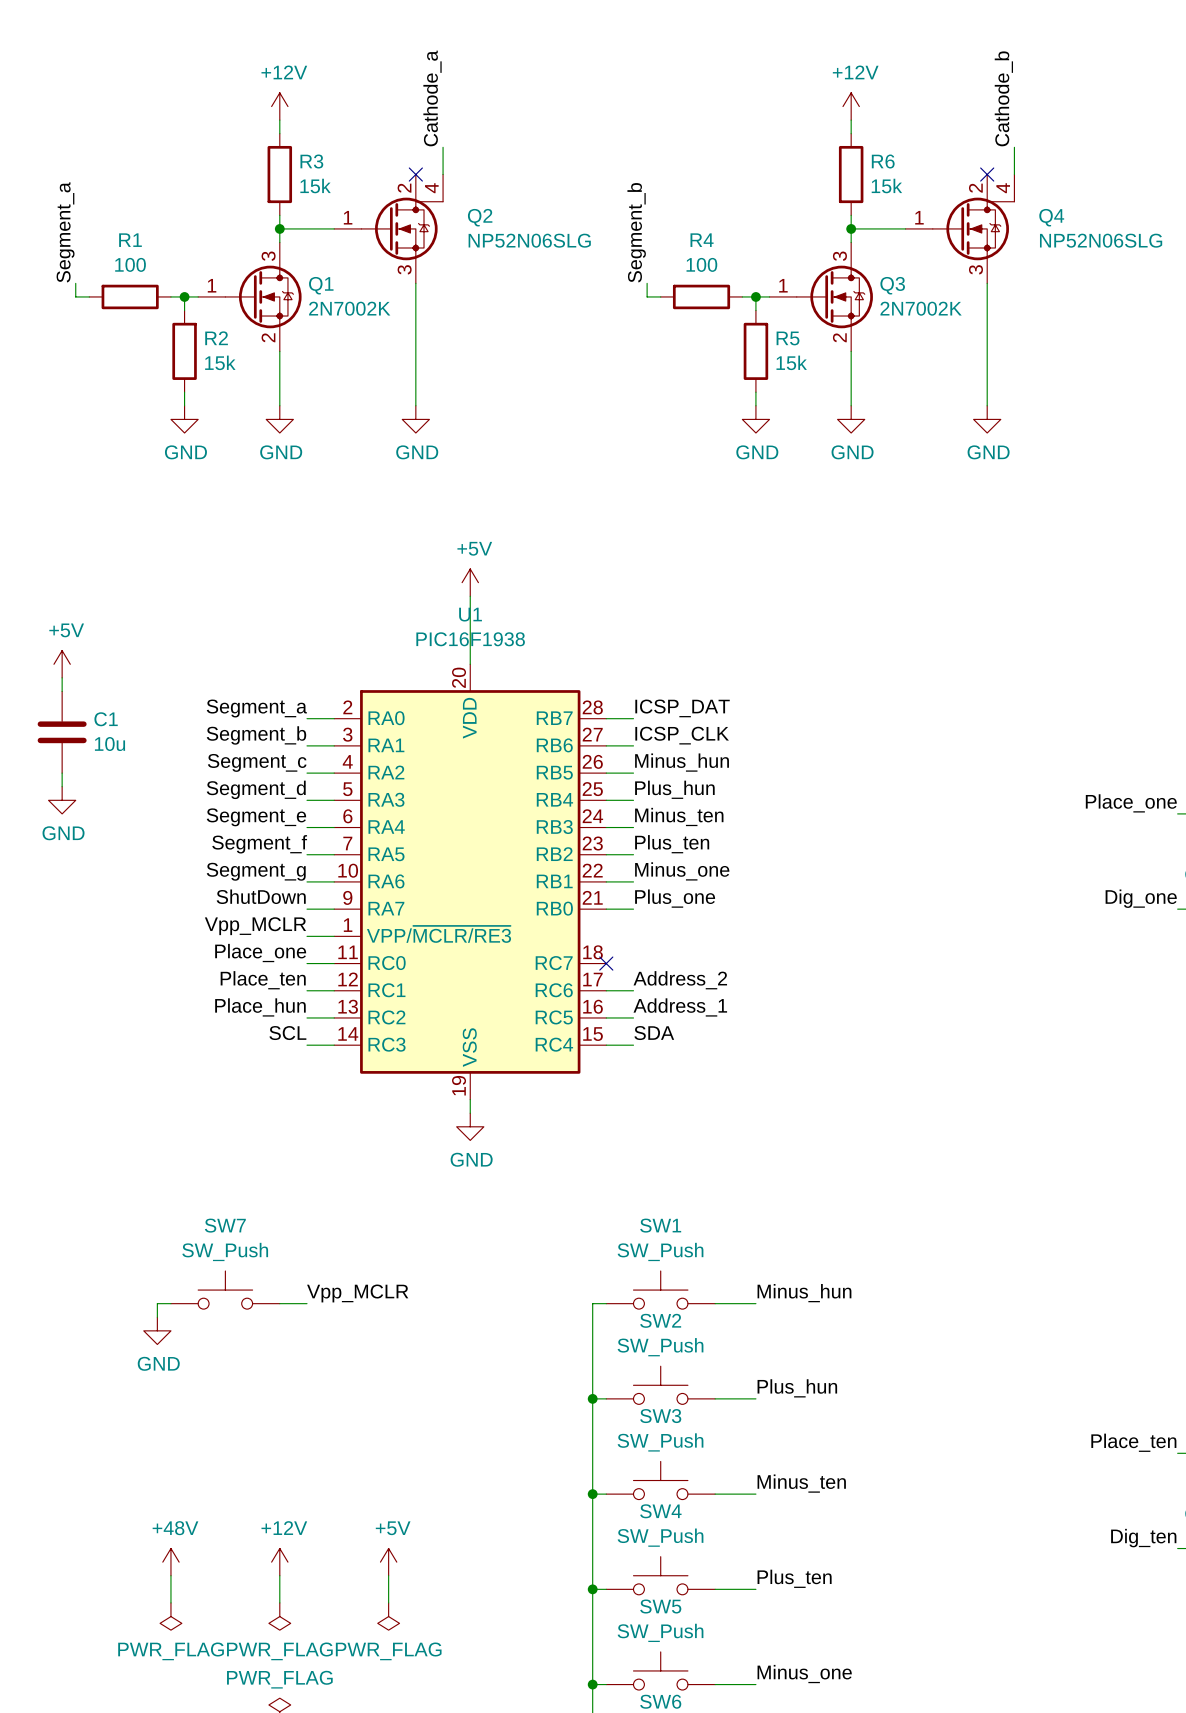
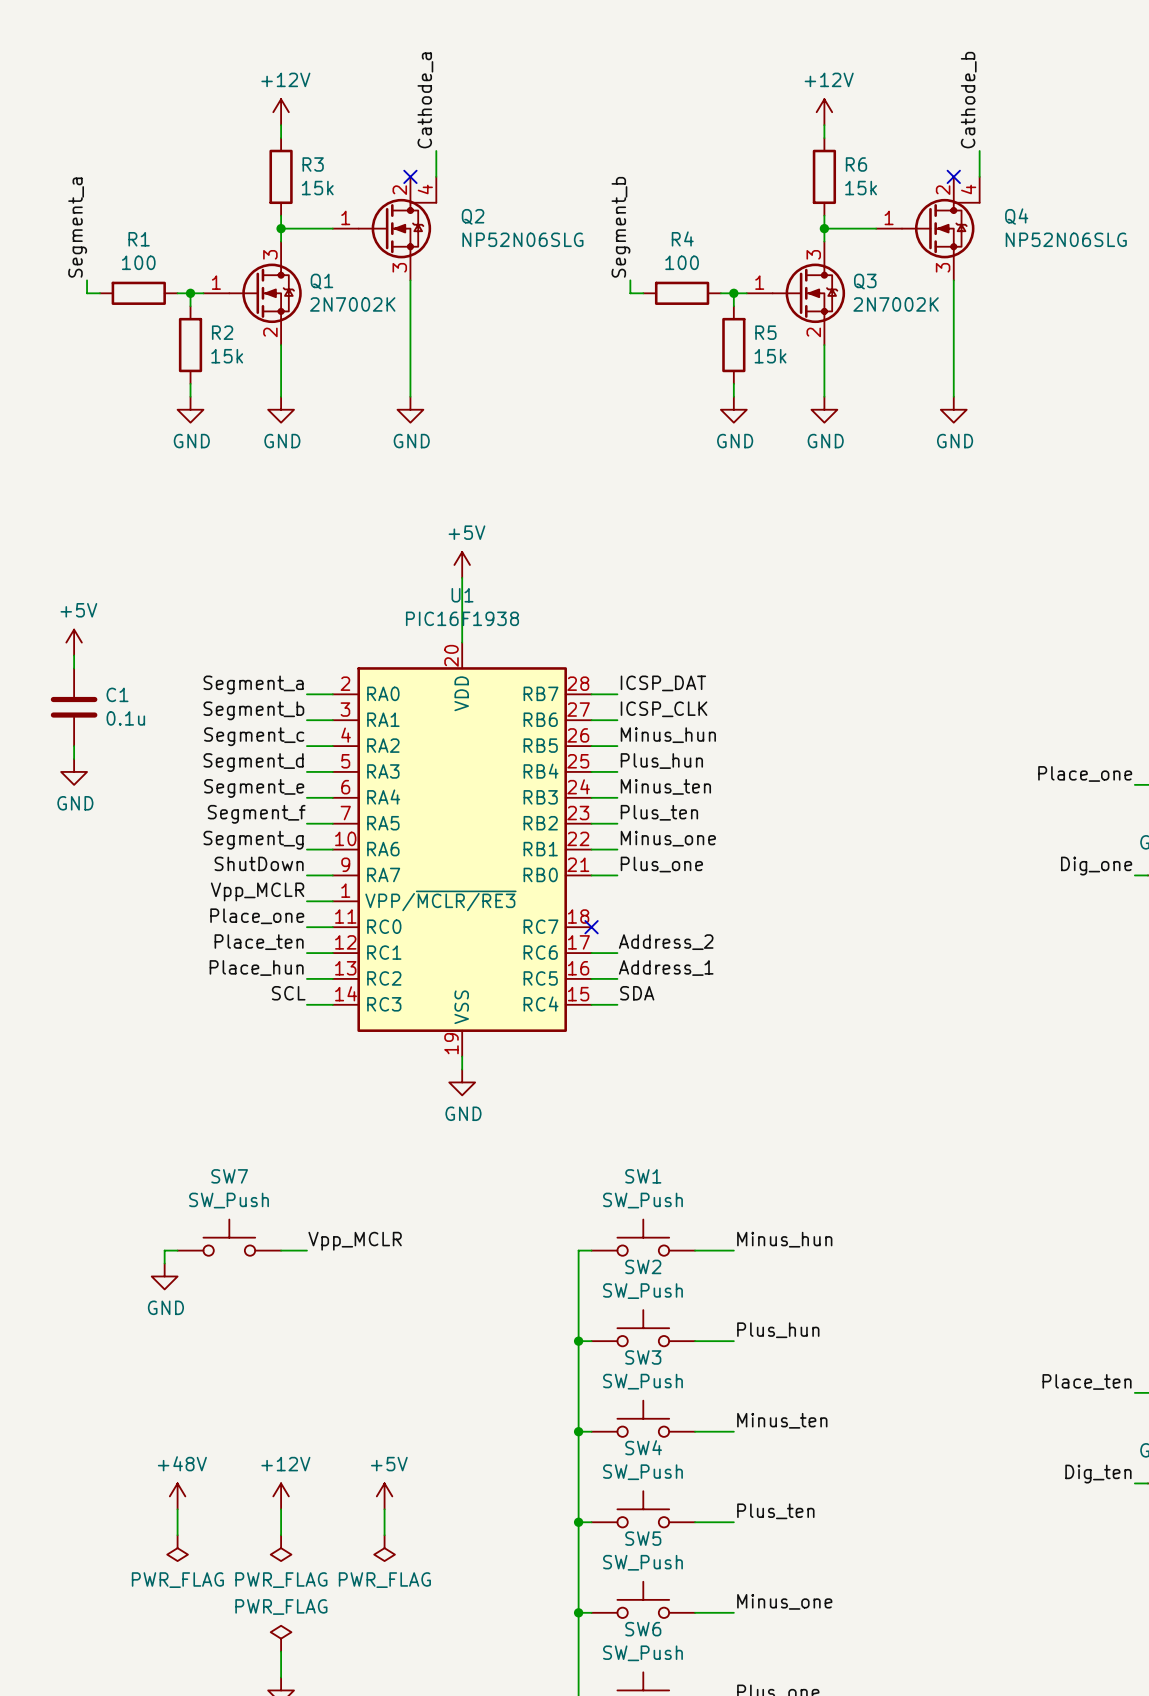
C1 value: 10u (110, 744) -> 0.1u (125, 718)

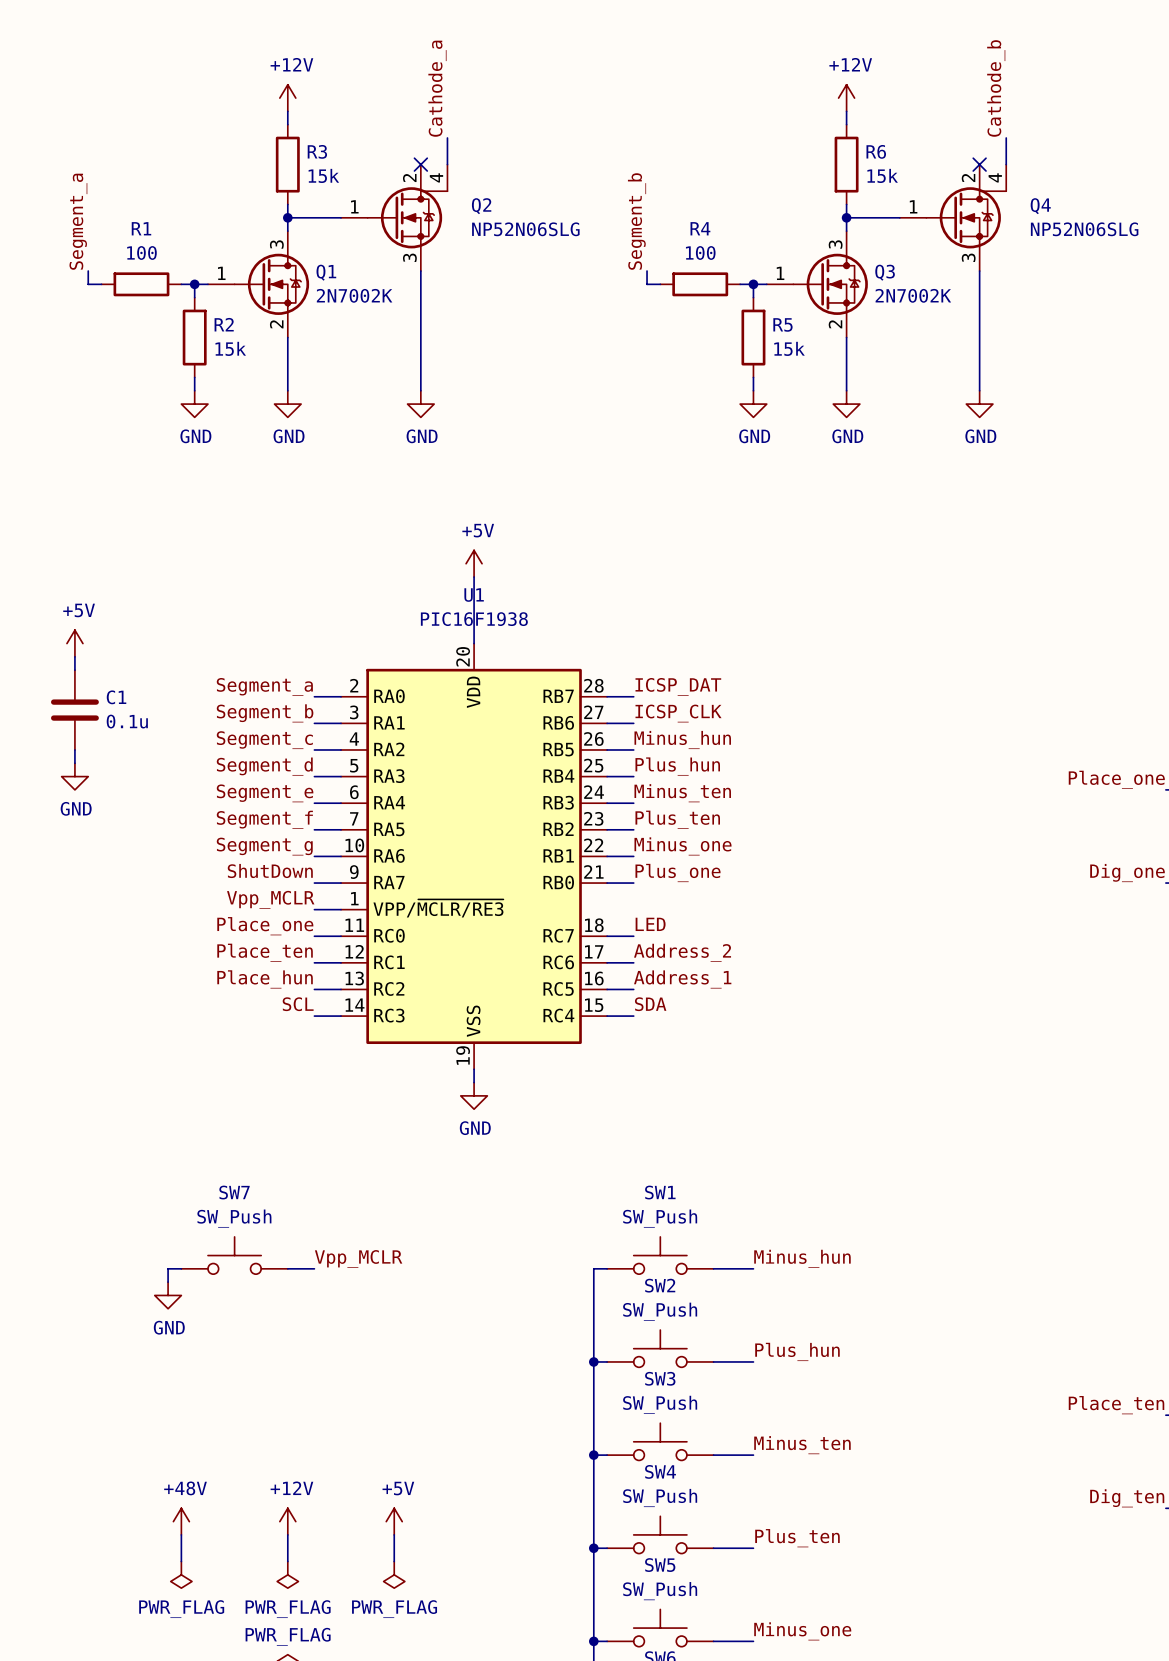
label: none -> LED (650, 924)
wire: none -> (607, 936) (633, 936)
no-connect mark: (591, 927) -> none

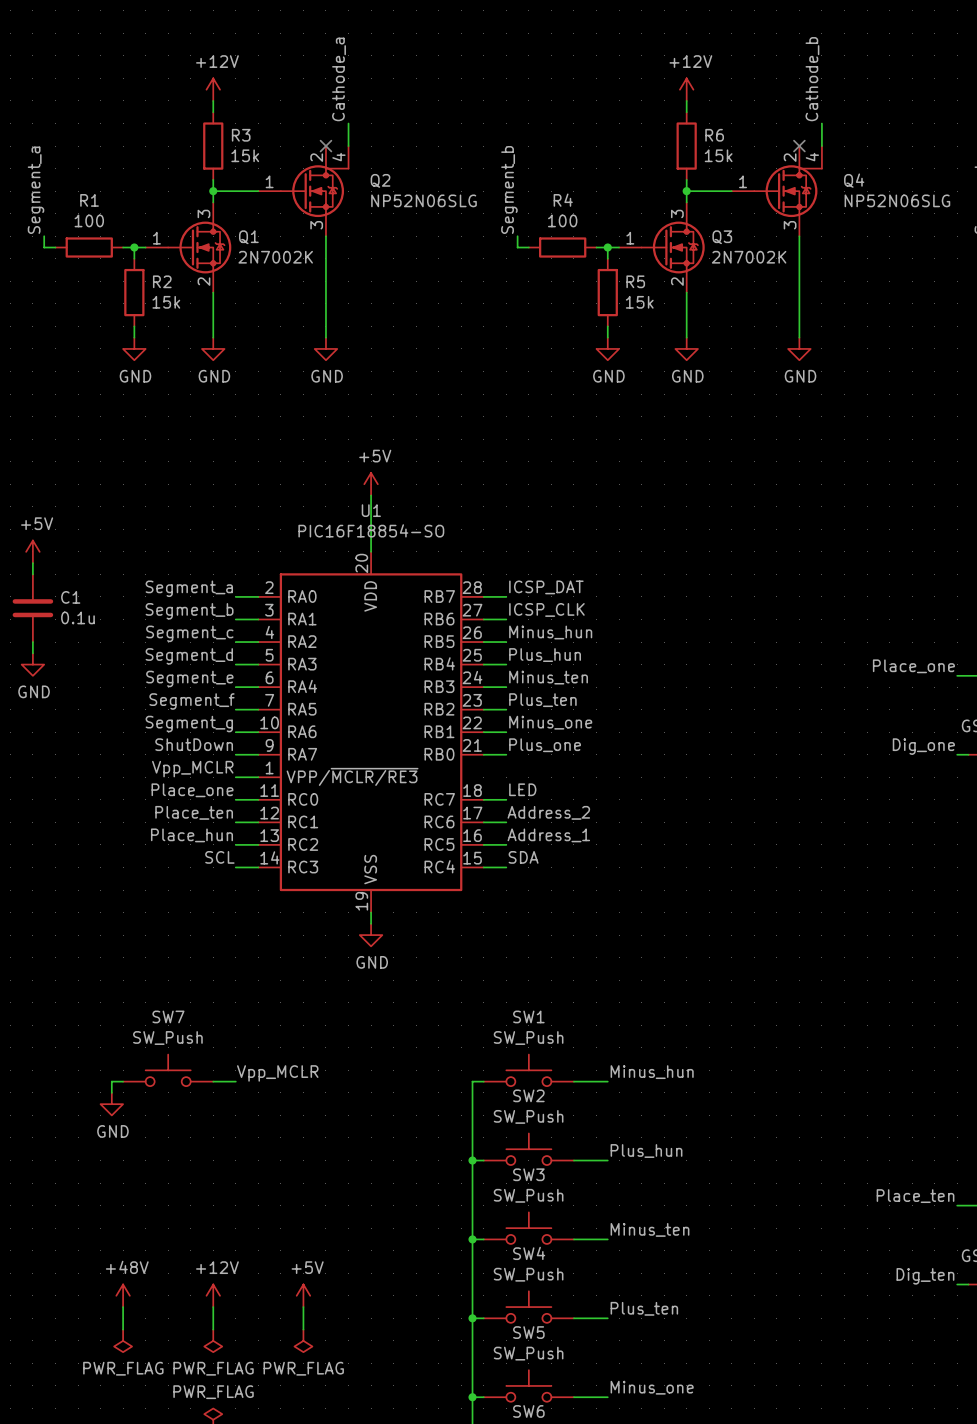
U1 value: PIC16F1938 (474, 619) -> PIC16F18854-SO (371, 530)

